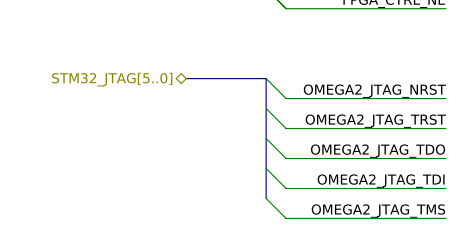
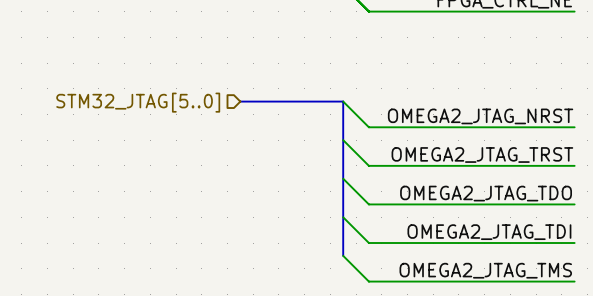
hierarchical label shape: bidirectional (112, 79) -> input (138, 102)

